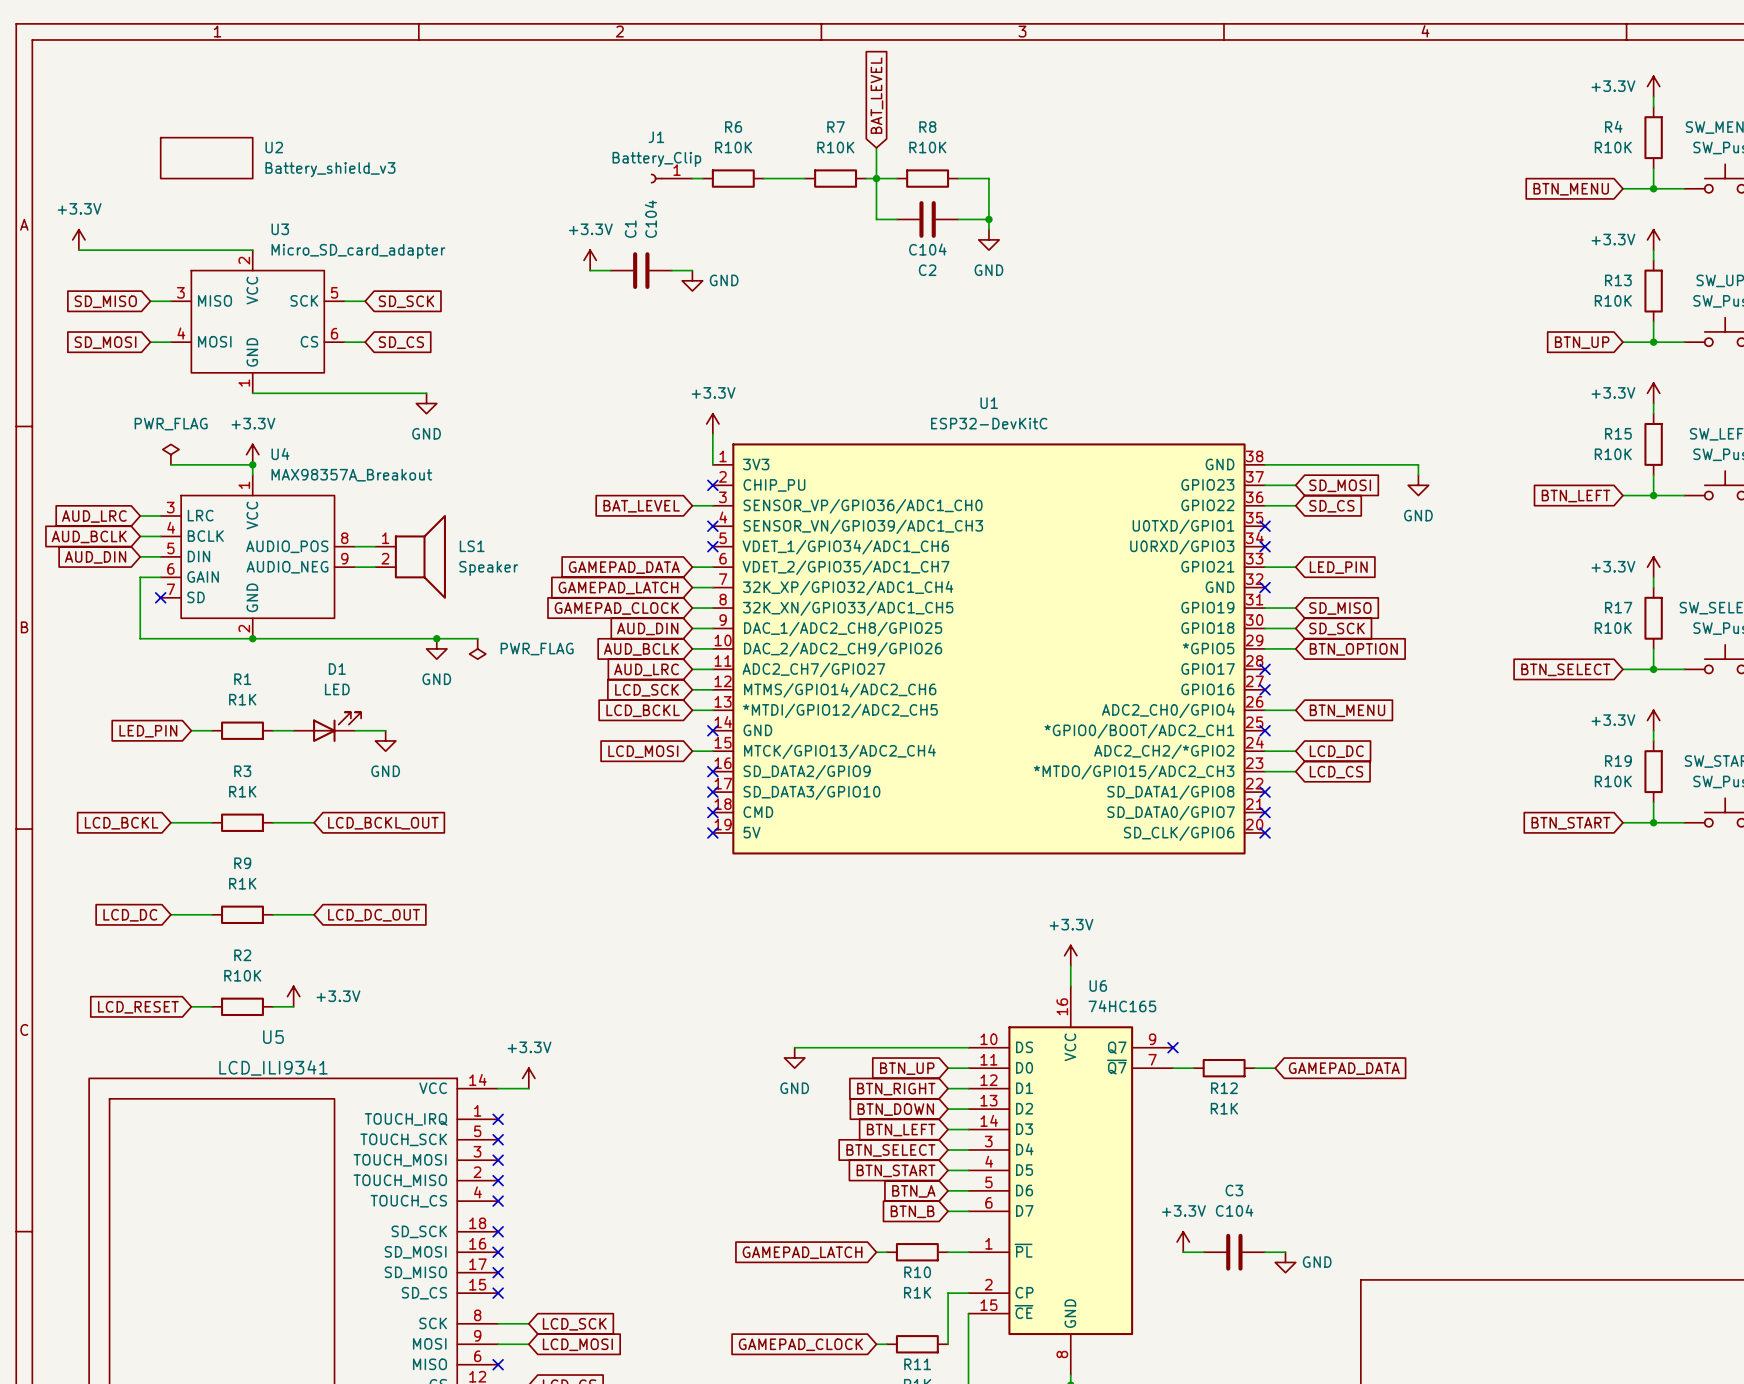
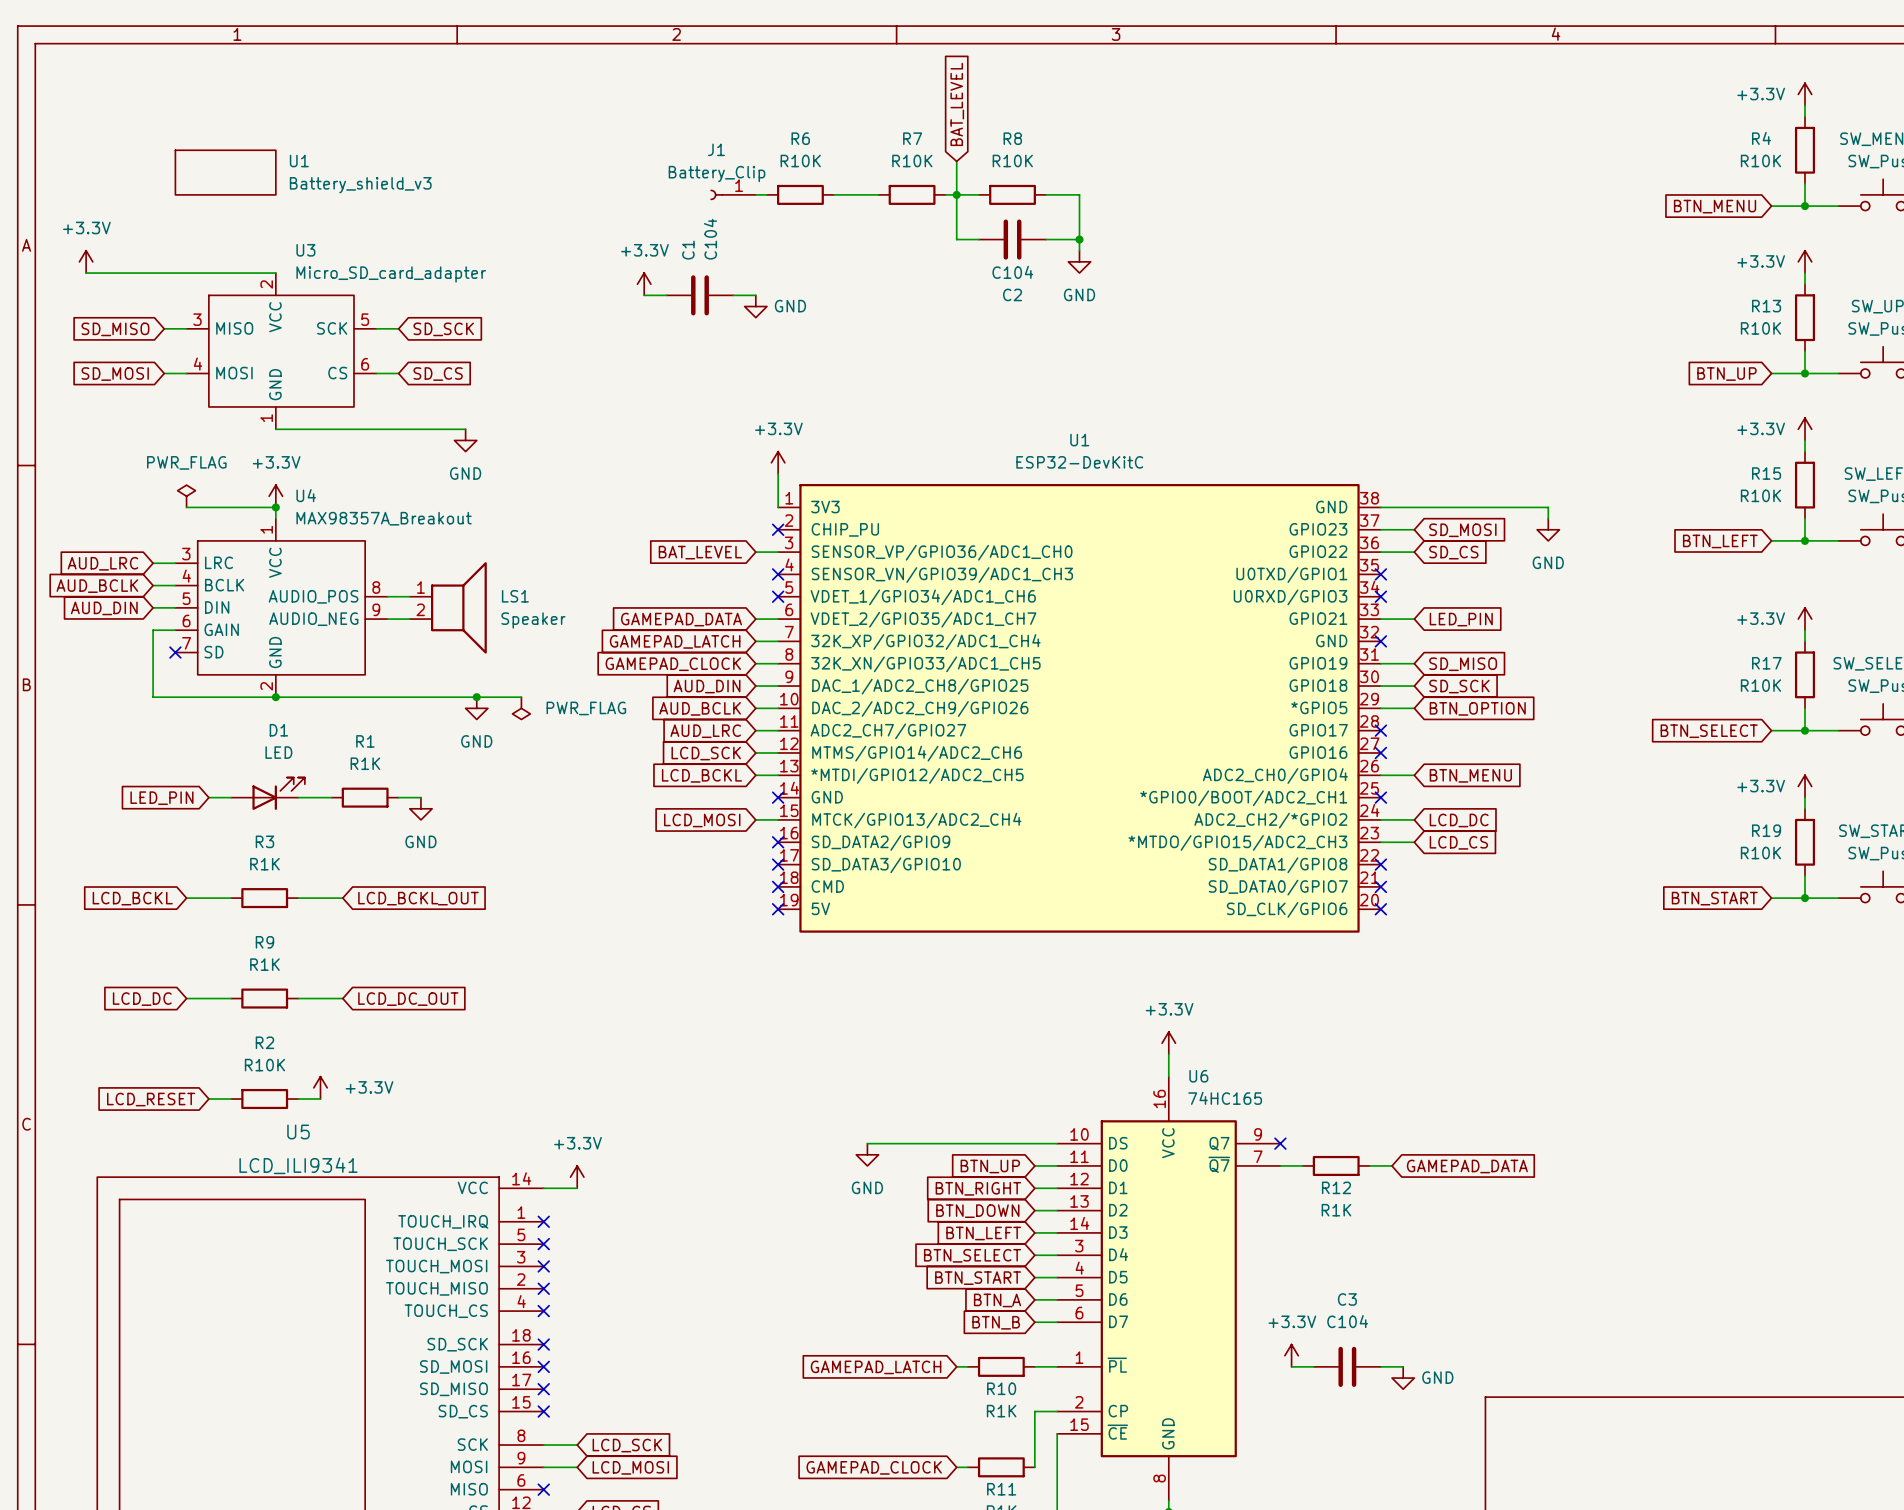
U2 name: U2 (274, 147) -> U1 (299, 161)
D1 position: (327, 727) -> (268, 793)
R1 position: (242, 730) -> (365, 797)

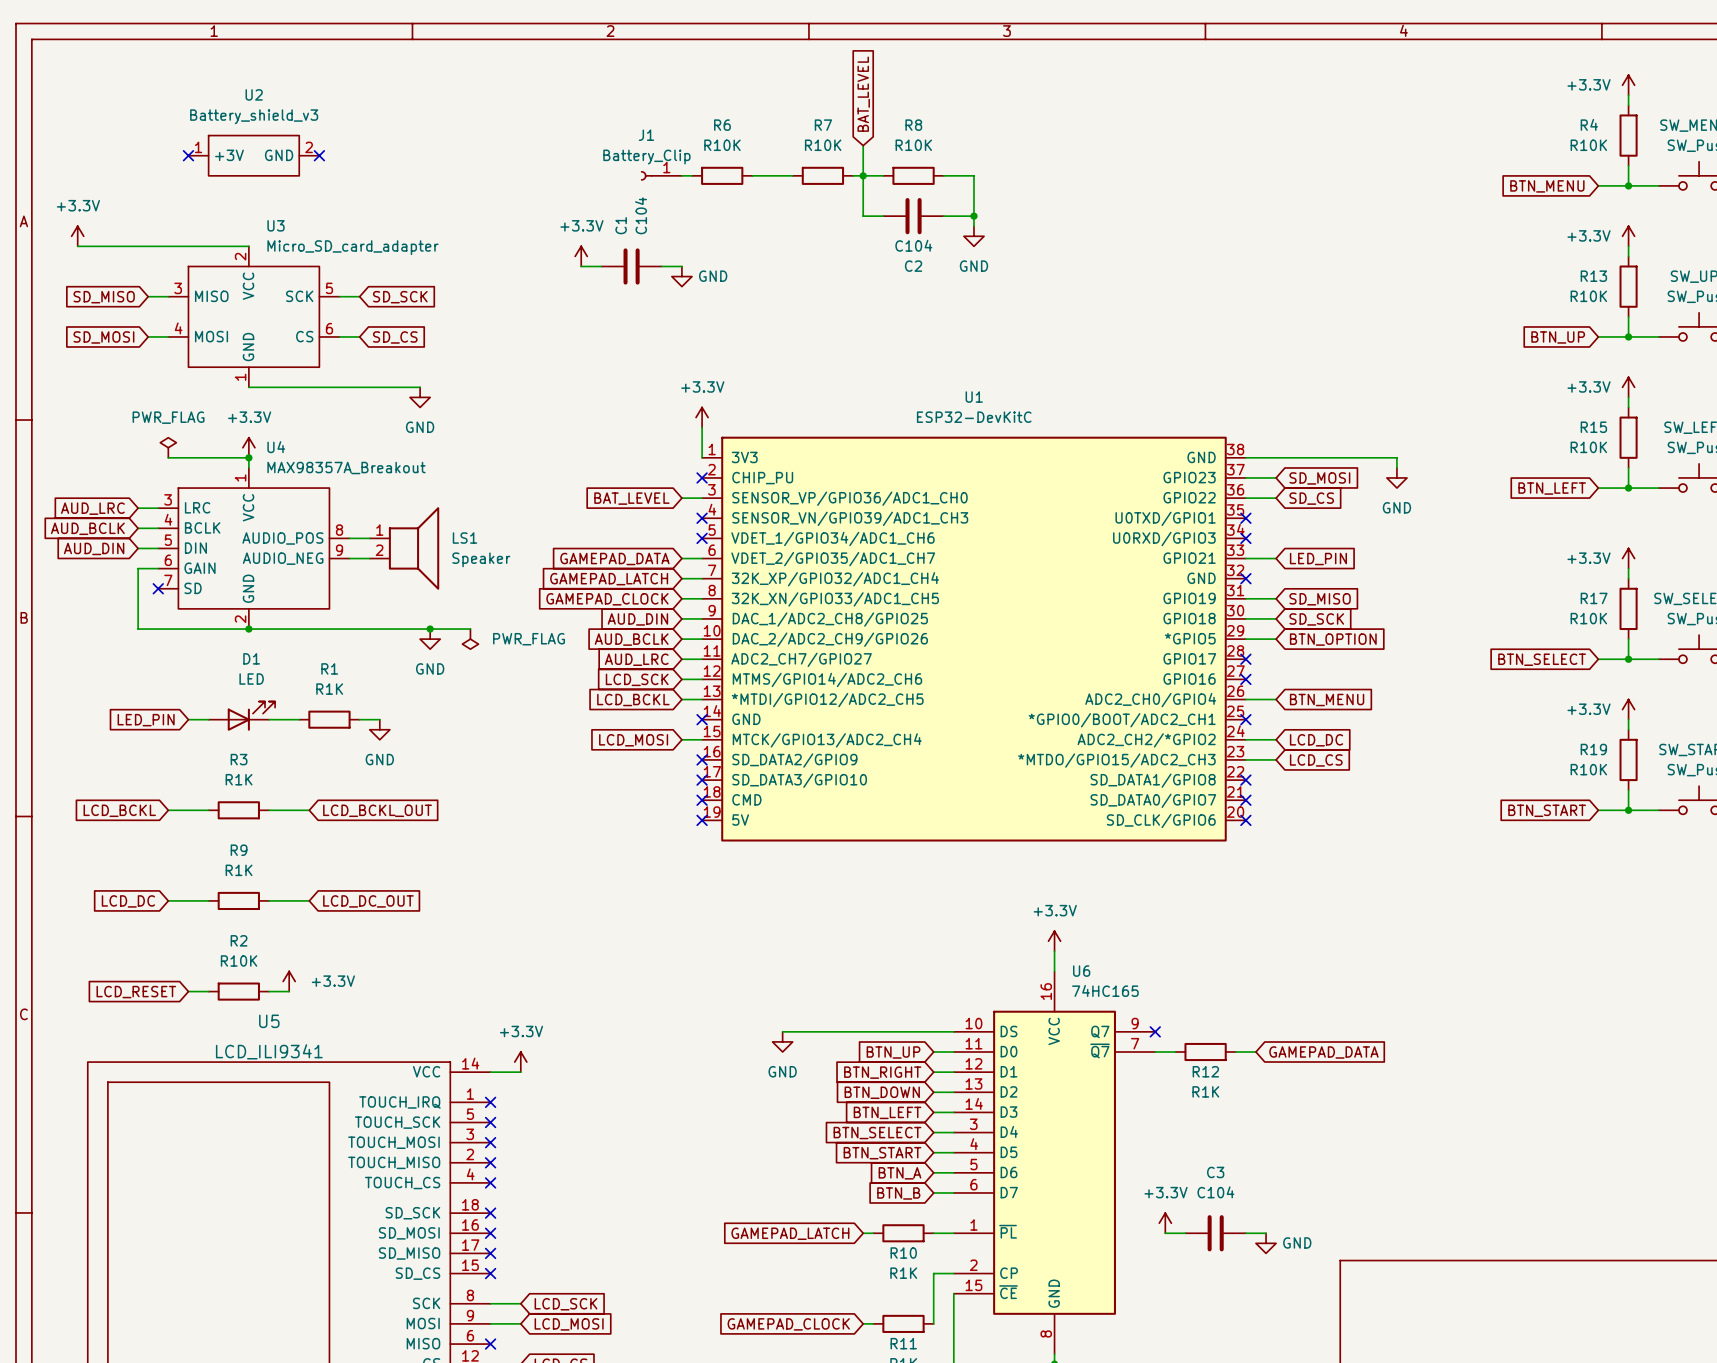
no-connect mark: none -> (188, 155)
U1: Battery_shield_v3 (225, 172) -> none
U2: none -> Battery_shield_v3 (253, 155)
no-connect mark: none -> (319, 155)

